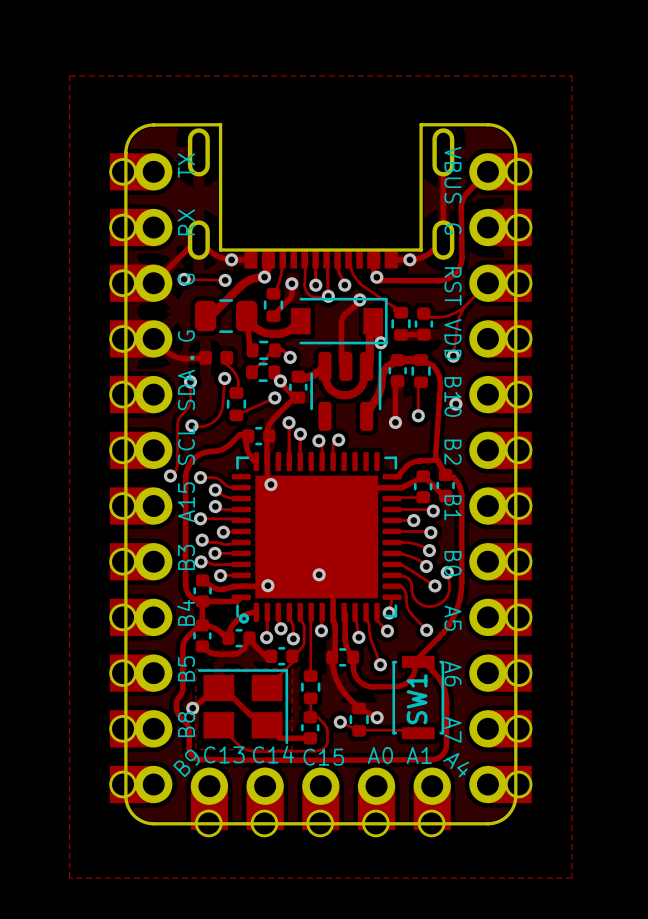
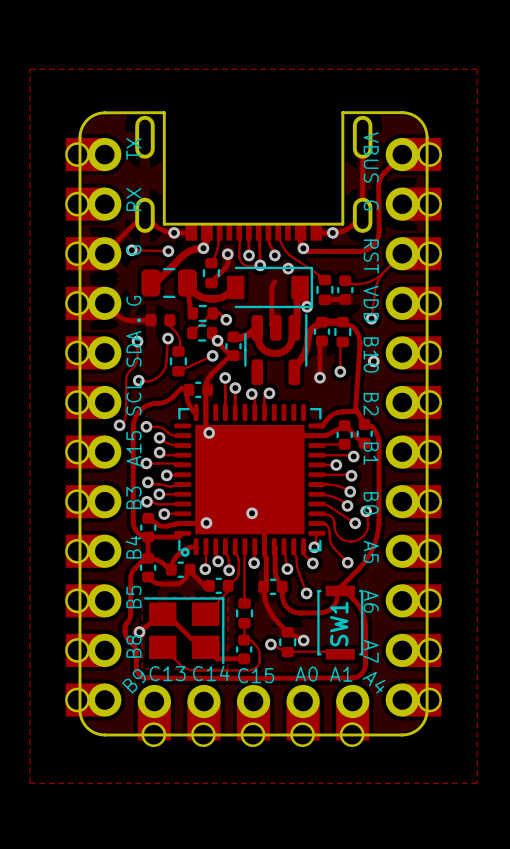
track: (359, 299) (359, 302) (344, 314) -> none

